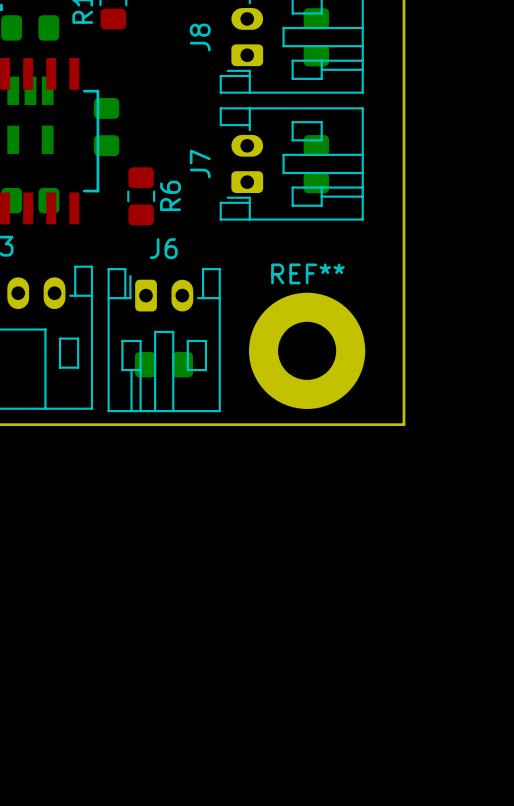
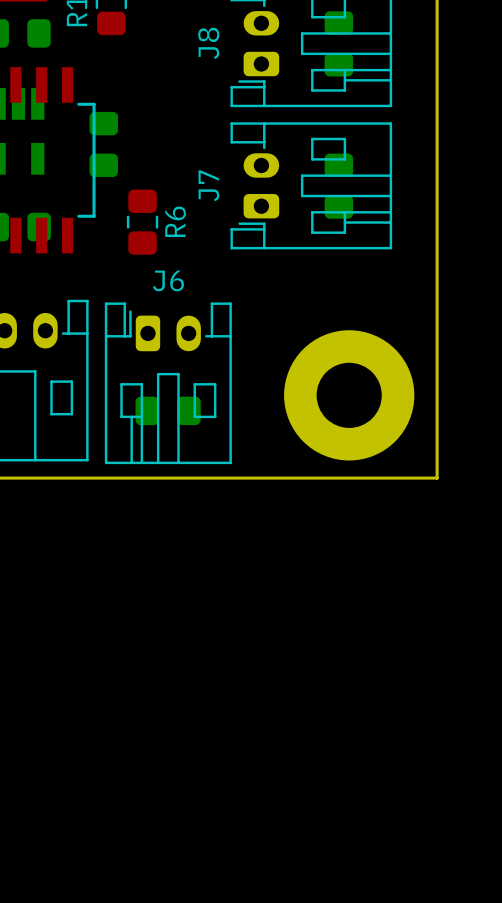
REF**: (307, 350) -> none
part: none -> (349, 395)

